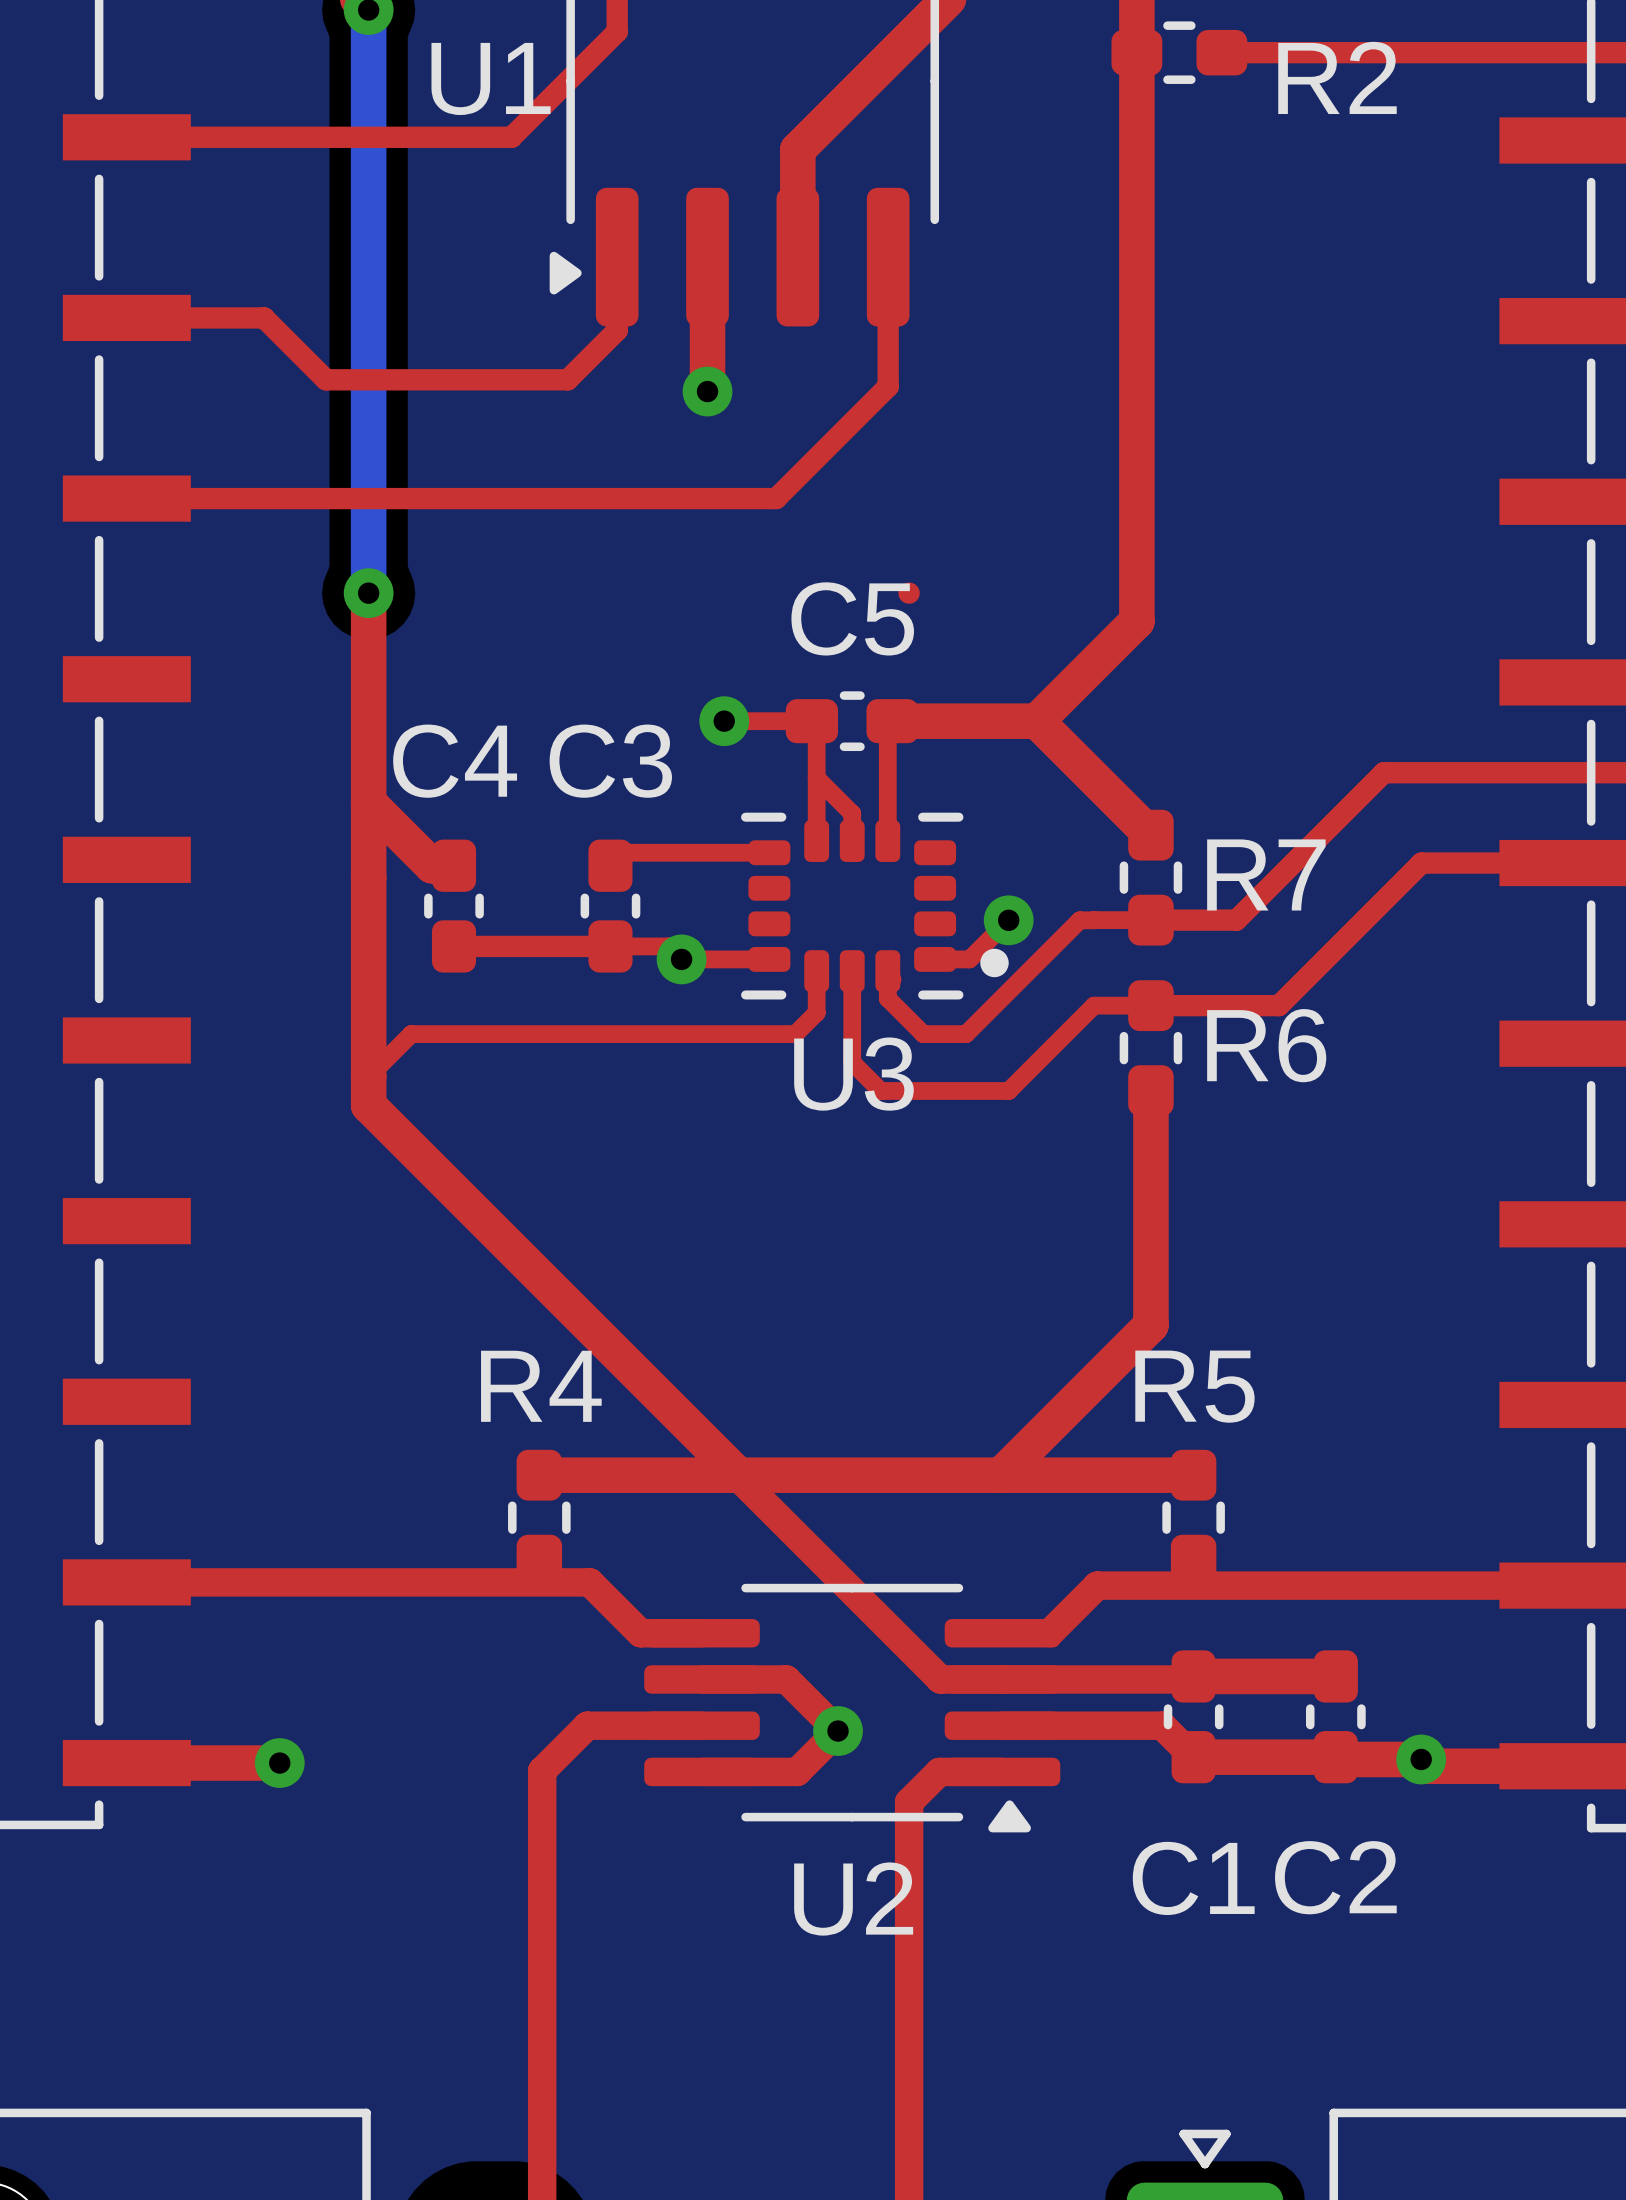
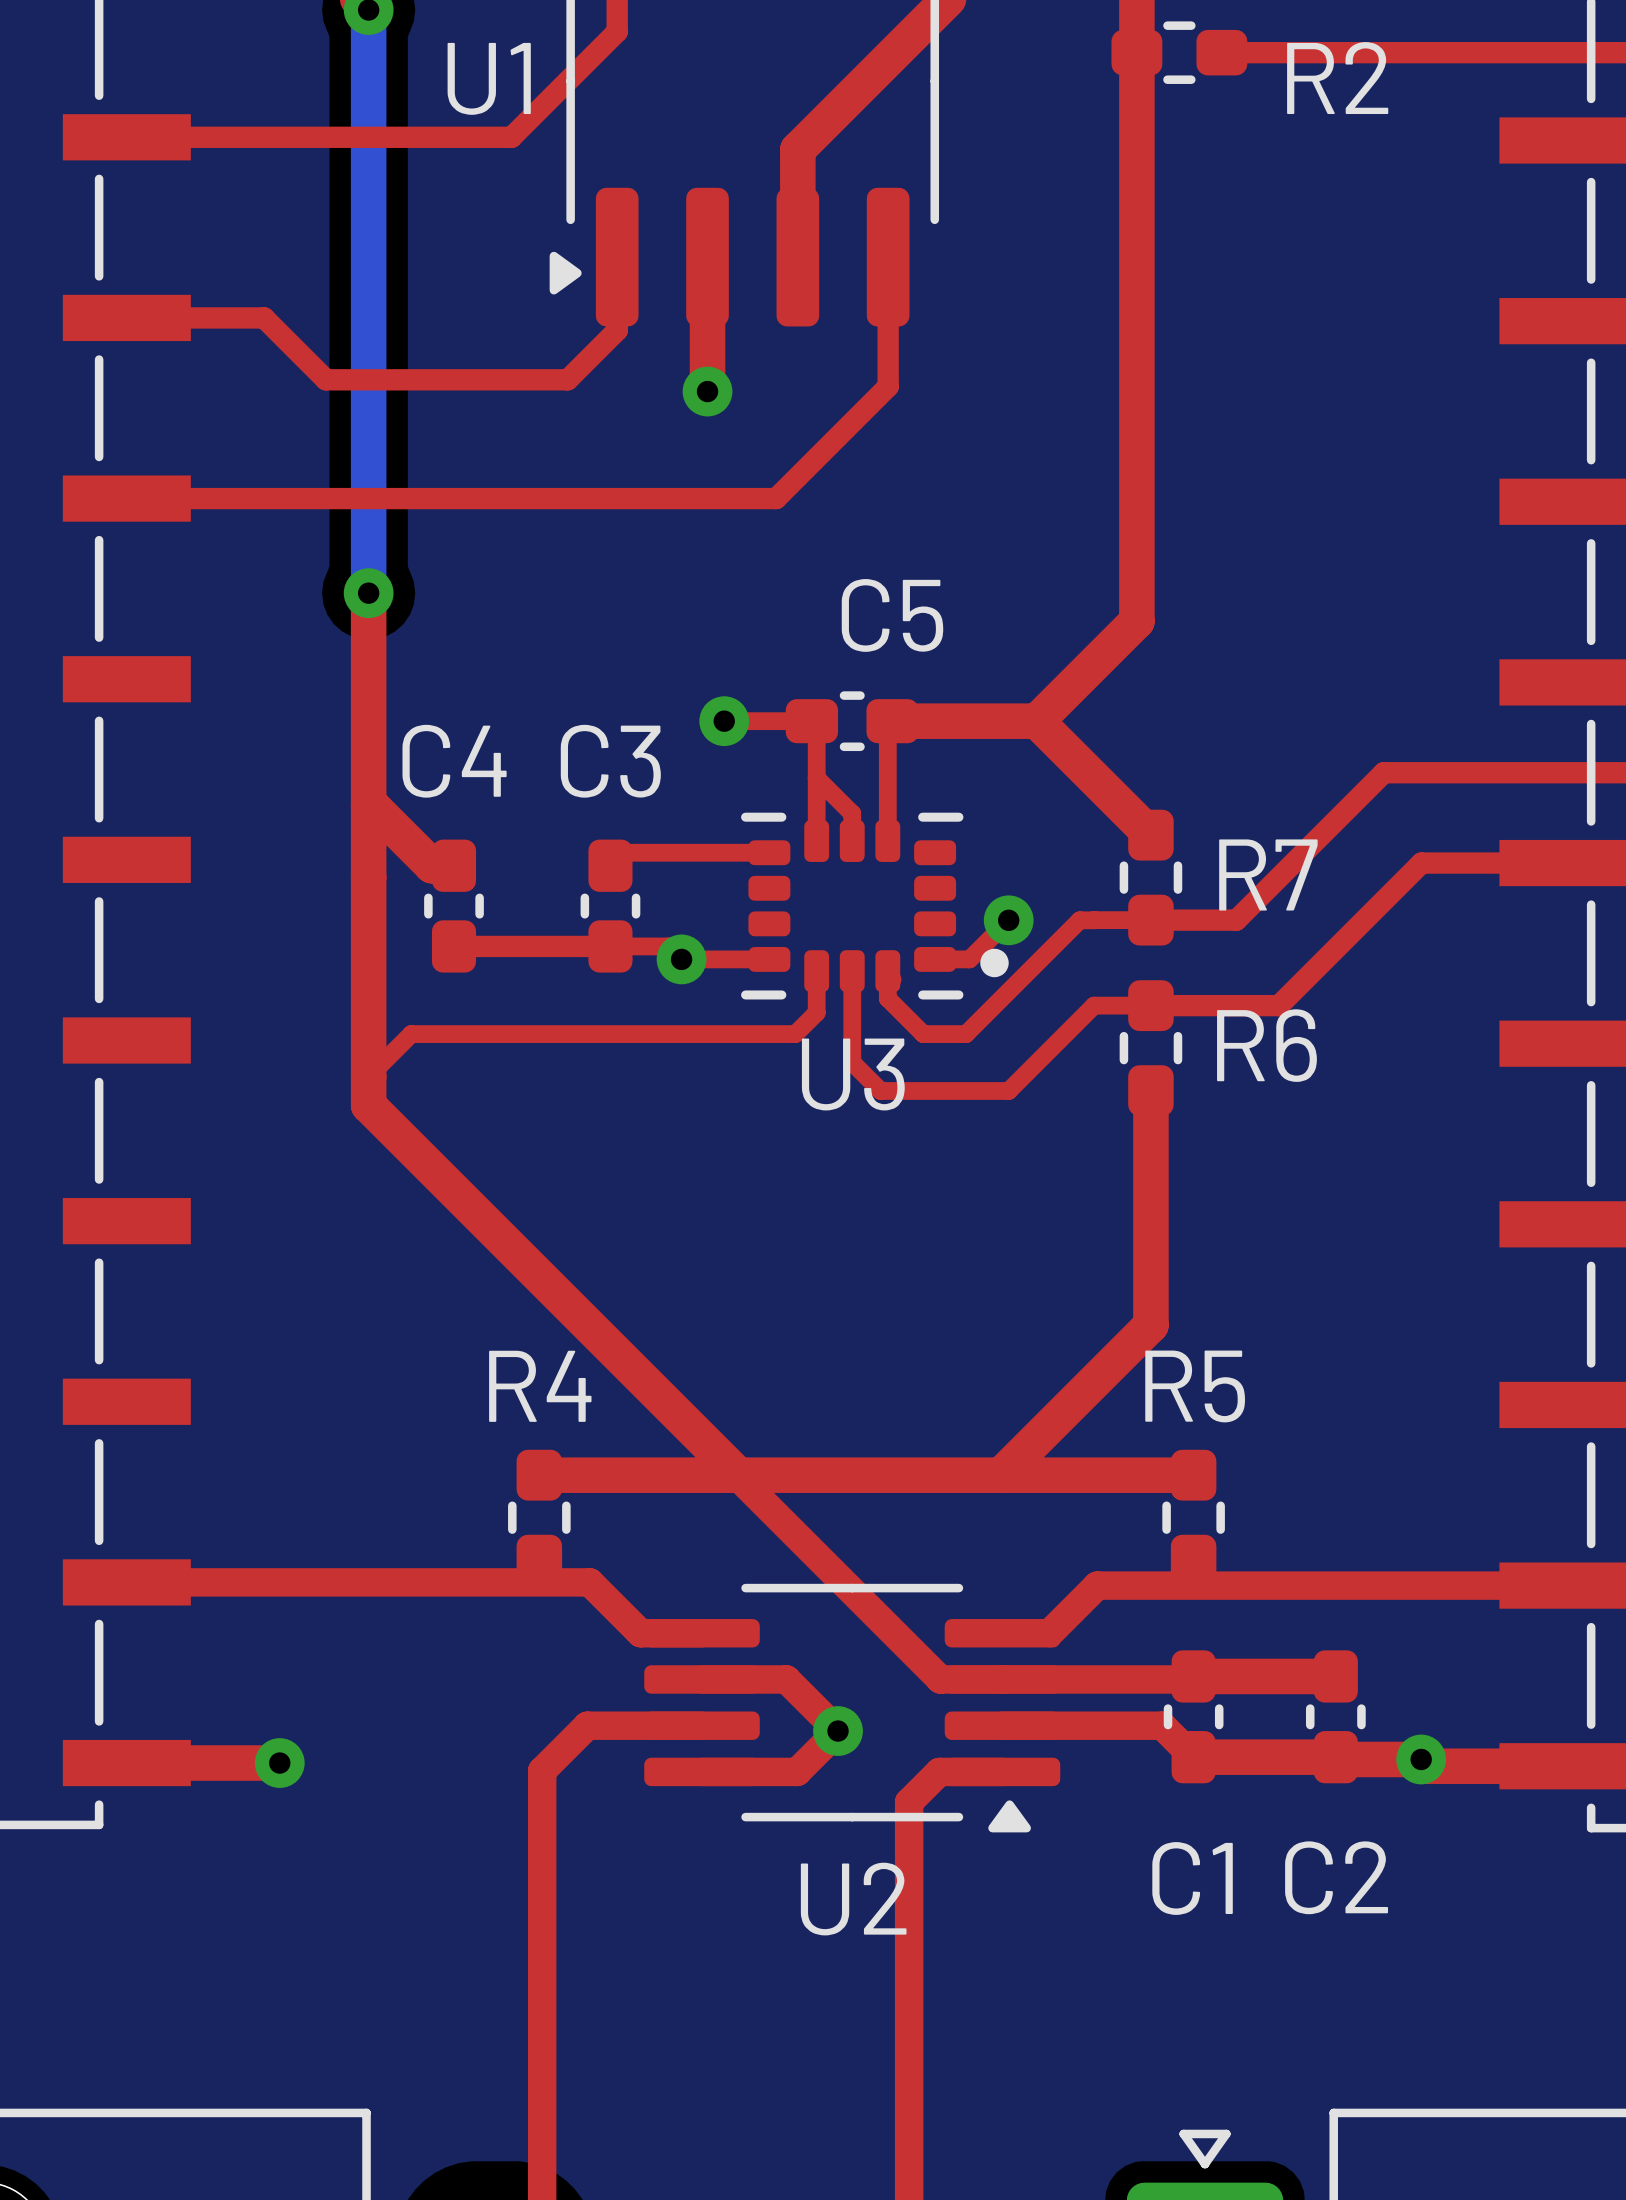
C5 name position: C5 (852, 618) -> C5 (892, 615)

